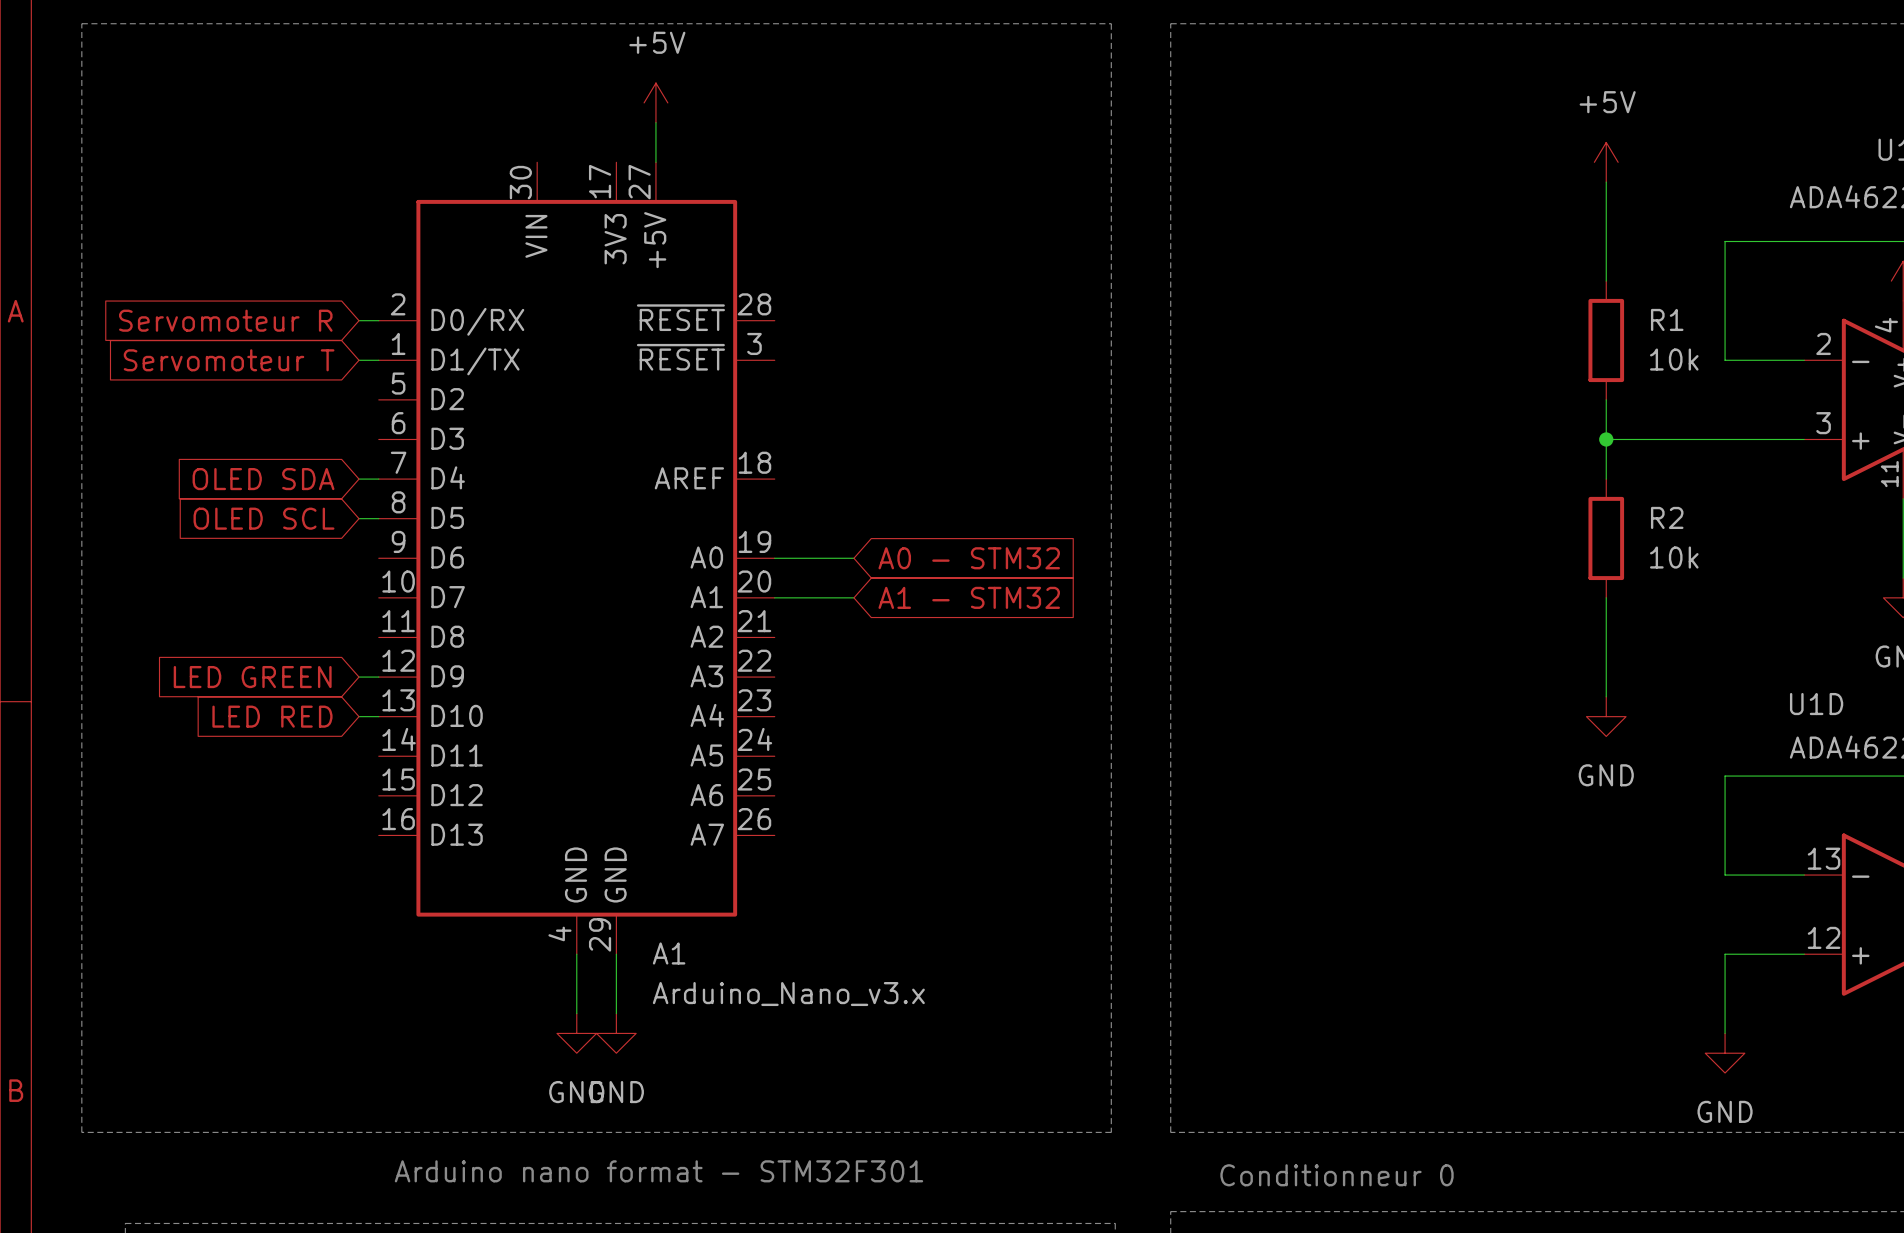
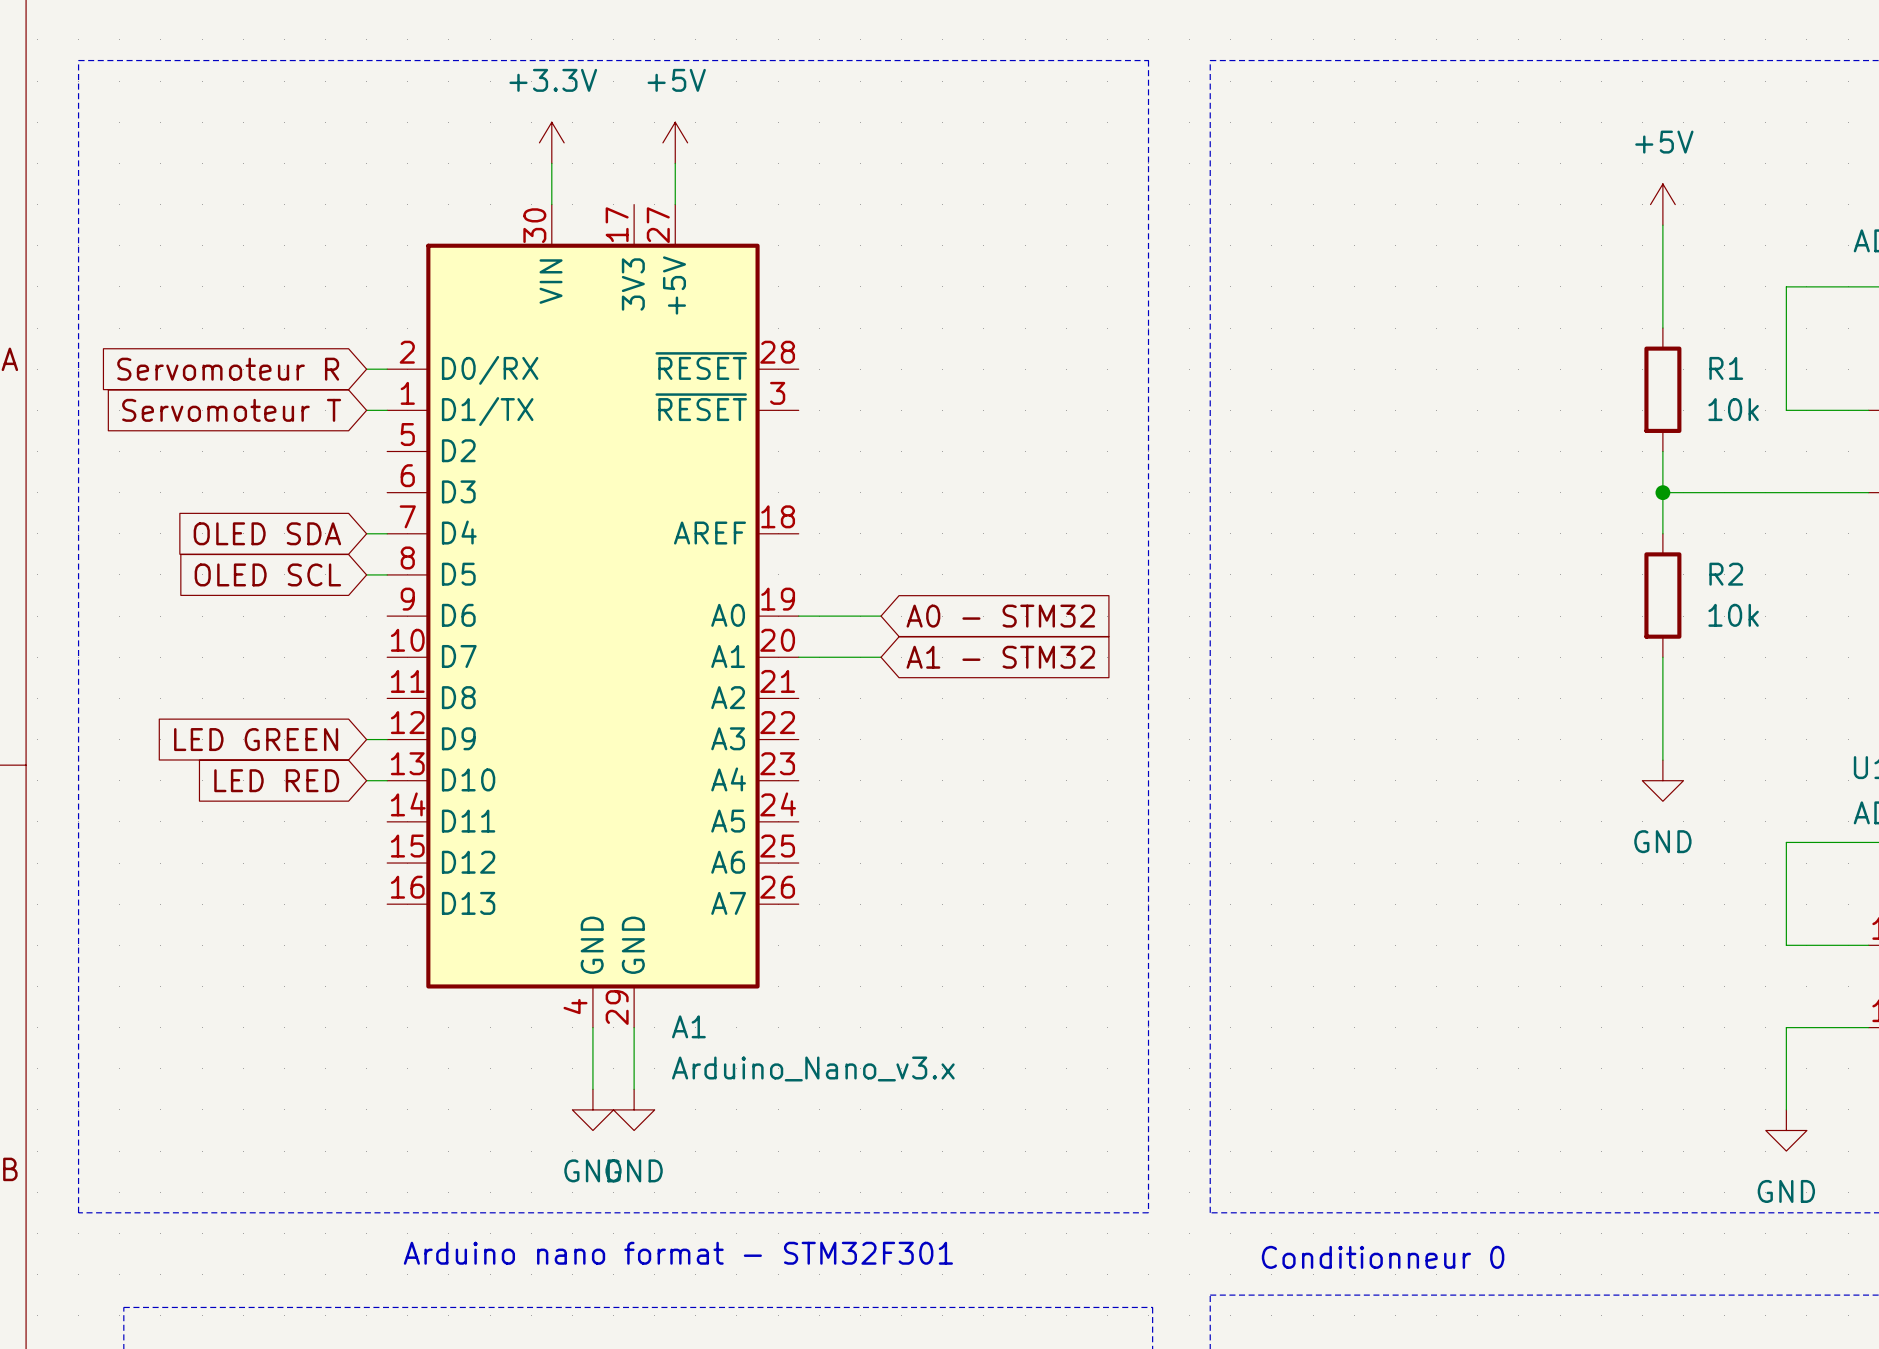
power symbol: none -> +3.3V (551, 142)
wire: none -> (551, 163) (551, 204)

